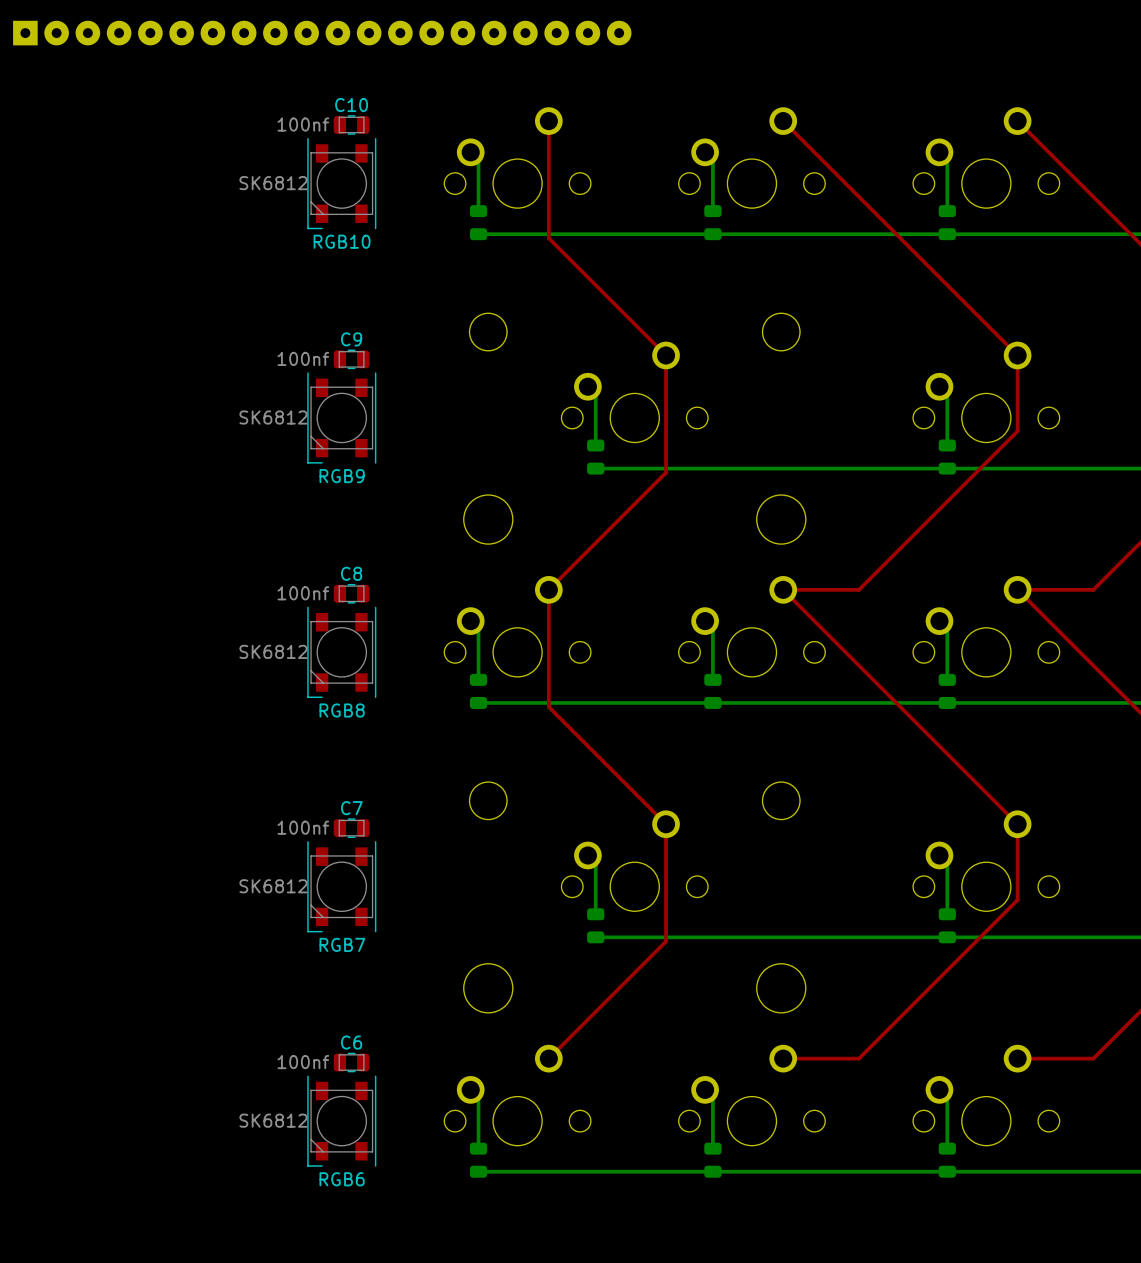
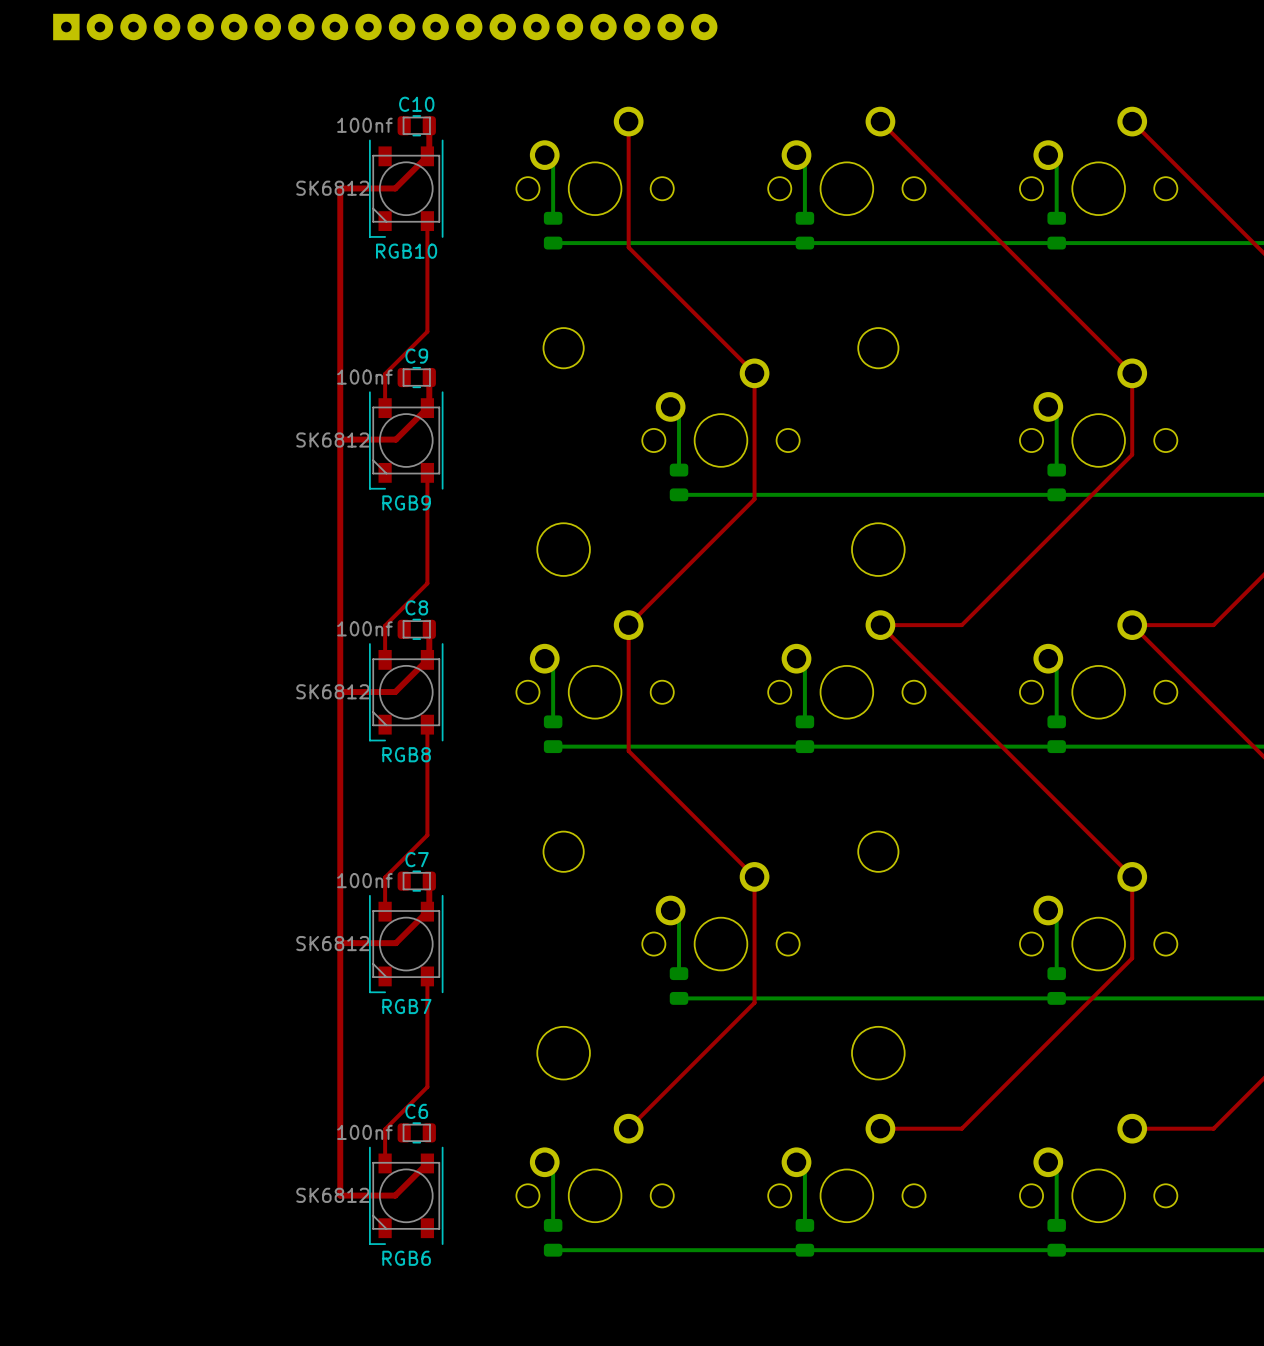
top track: none -> (429, 125) (429, 154) (395, 188) (340, 188) (340, 1195) (395, 1195) (427, 1163)
top track: none -> (427, 221) (427, 331) (385, 373) (385, 408)
top track: none -> (429, 377) (429, 406) (395, 439) (340, 439)
top track: none -> (427, 472) (427, 583) (385, 625) (385, 659)
top track: none -> (429, 629) (429, 657) (395, 692) (340, 692)
top track: none -> (427, 724) (427, 835) (385, 877) (385, 911)
top track: none -> (429, 881) (429, 909) (395, 943) (340, 943)
top track: none -> (427, 976) (427, 1087) (385, 1129) (385, 1163)

